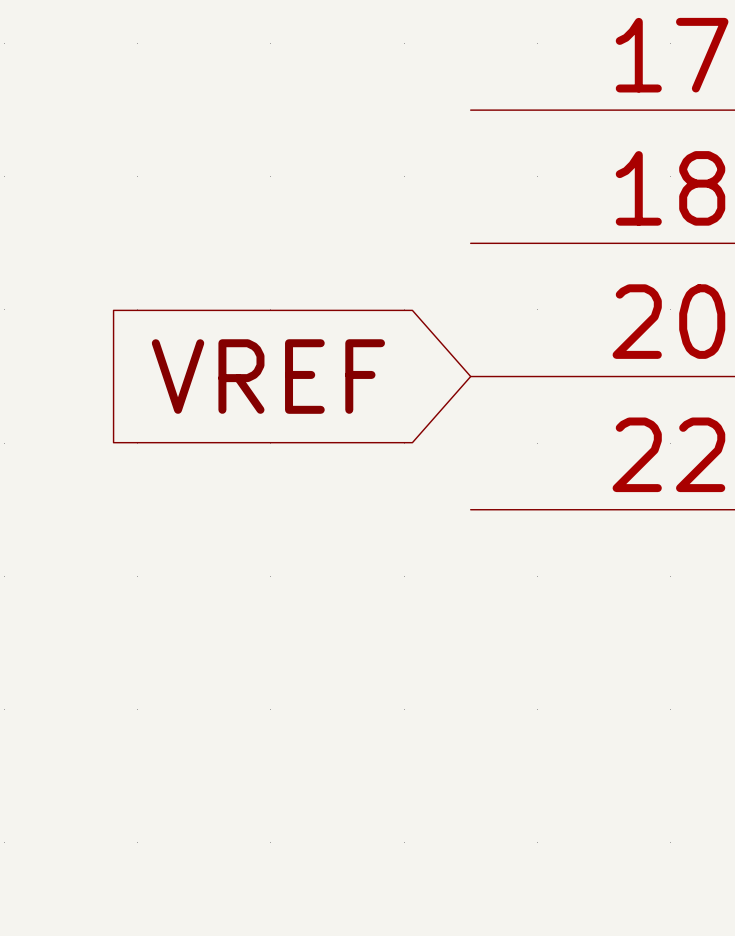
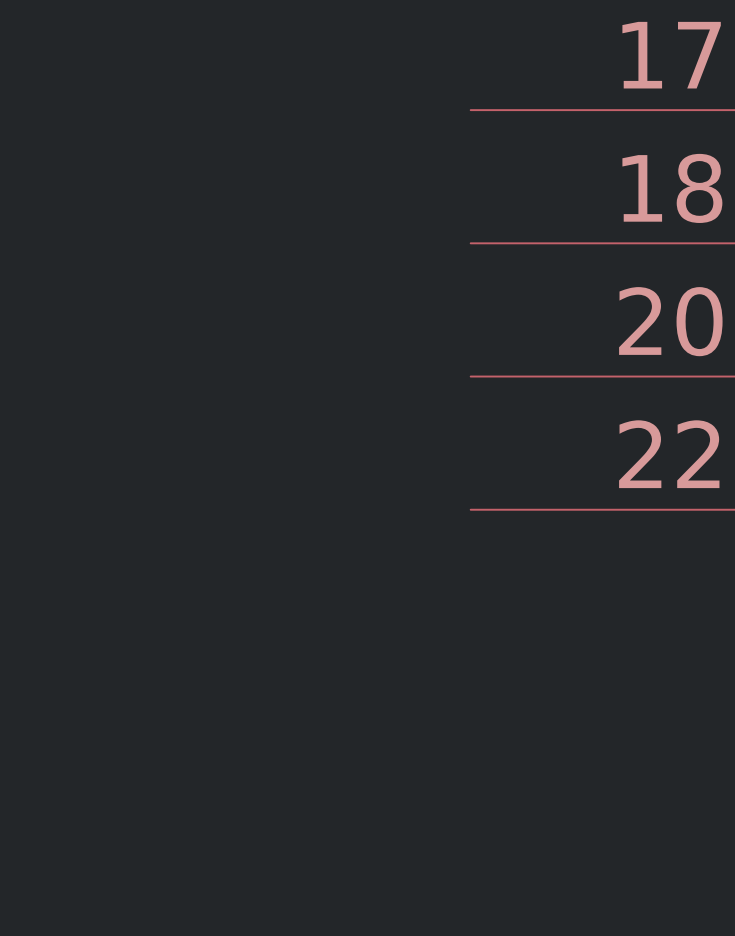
global label: VREF (268, 376) -> none

